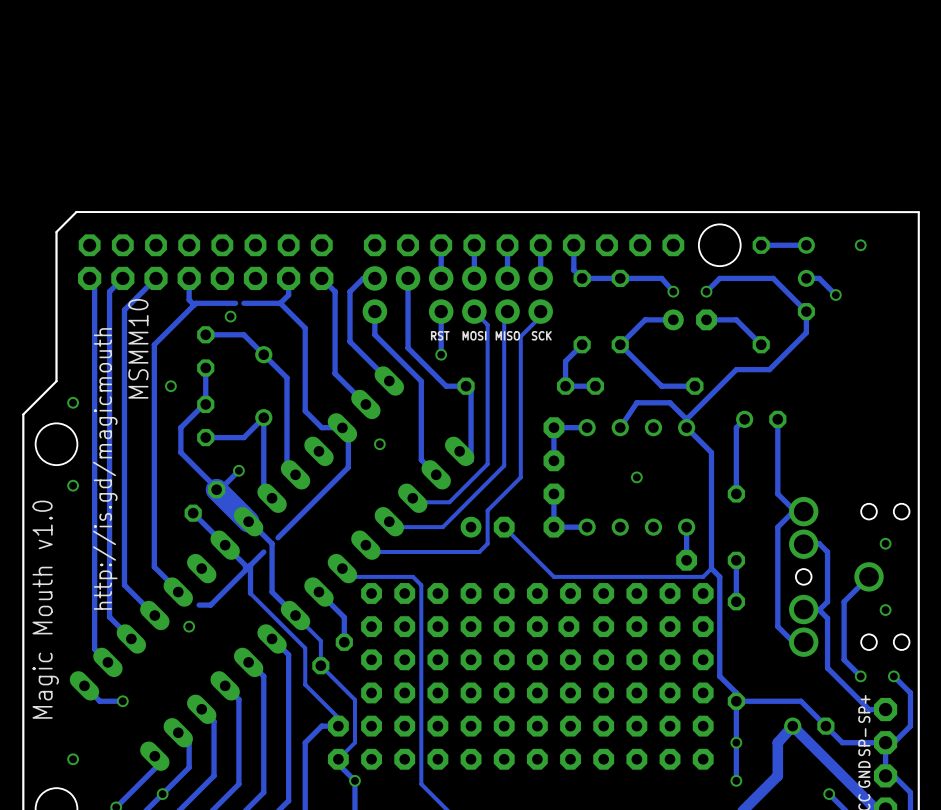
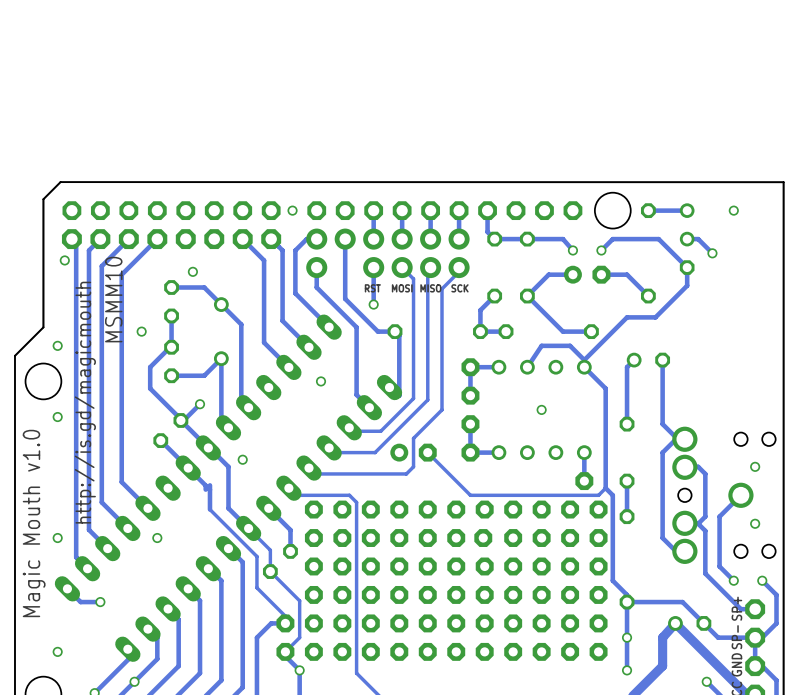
via: none -> (292, 210)
track: (189, 278) (189, 299) (194, 304) -> none
track: (288, 278) (288, 295) (280, 303) -> (242, 239) (264, 260) (264, 342) (288, 367)
via: none -> (64, 260)
track: (235, 303) (195, 303) (154, 344) (154, 566) (178, 592) -> (157, 239) (121, 274) (121, 482) (147, 508)
track: (280, 303) (243, 303) -> none
track: (280, 303) (305, 328) (305, 411) (321, 427) (335, 427) (348, 440) -> none
track: (342, 427) (348, 433) (348, 467) (278, 537) -> none
track width: thick (216, 489) (248, 521) -> thin (180, 420) (208, 447)
via: none -> (242, 459)
track: (263, 552) (210, 605) (199, 605) -> none
via: none -> (57, 538)

